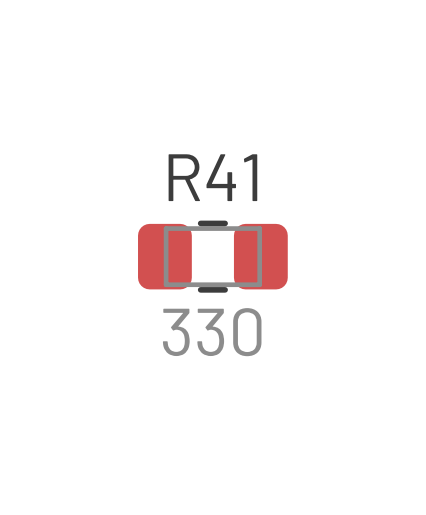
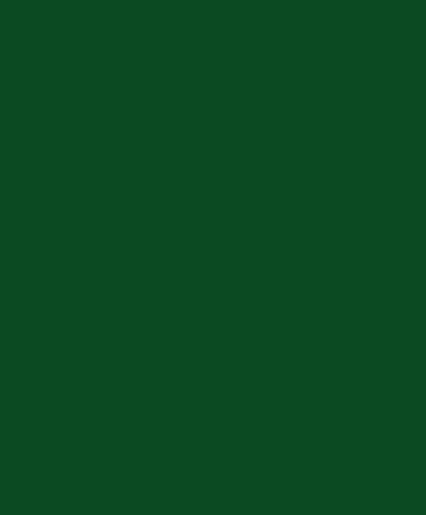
R41: 330 (212, 256) -> none

